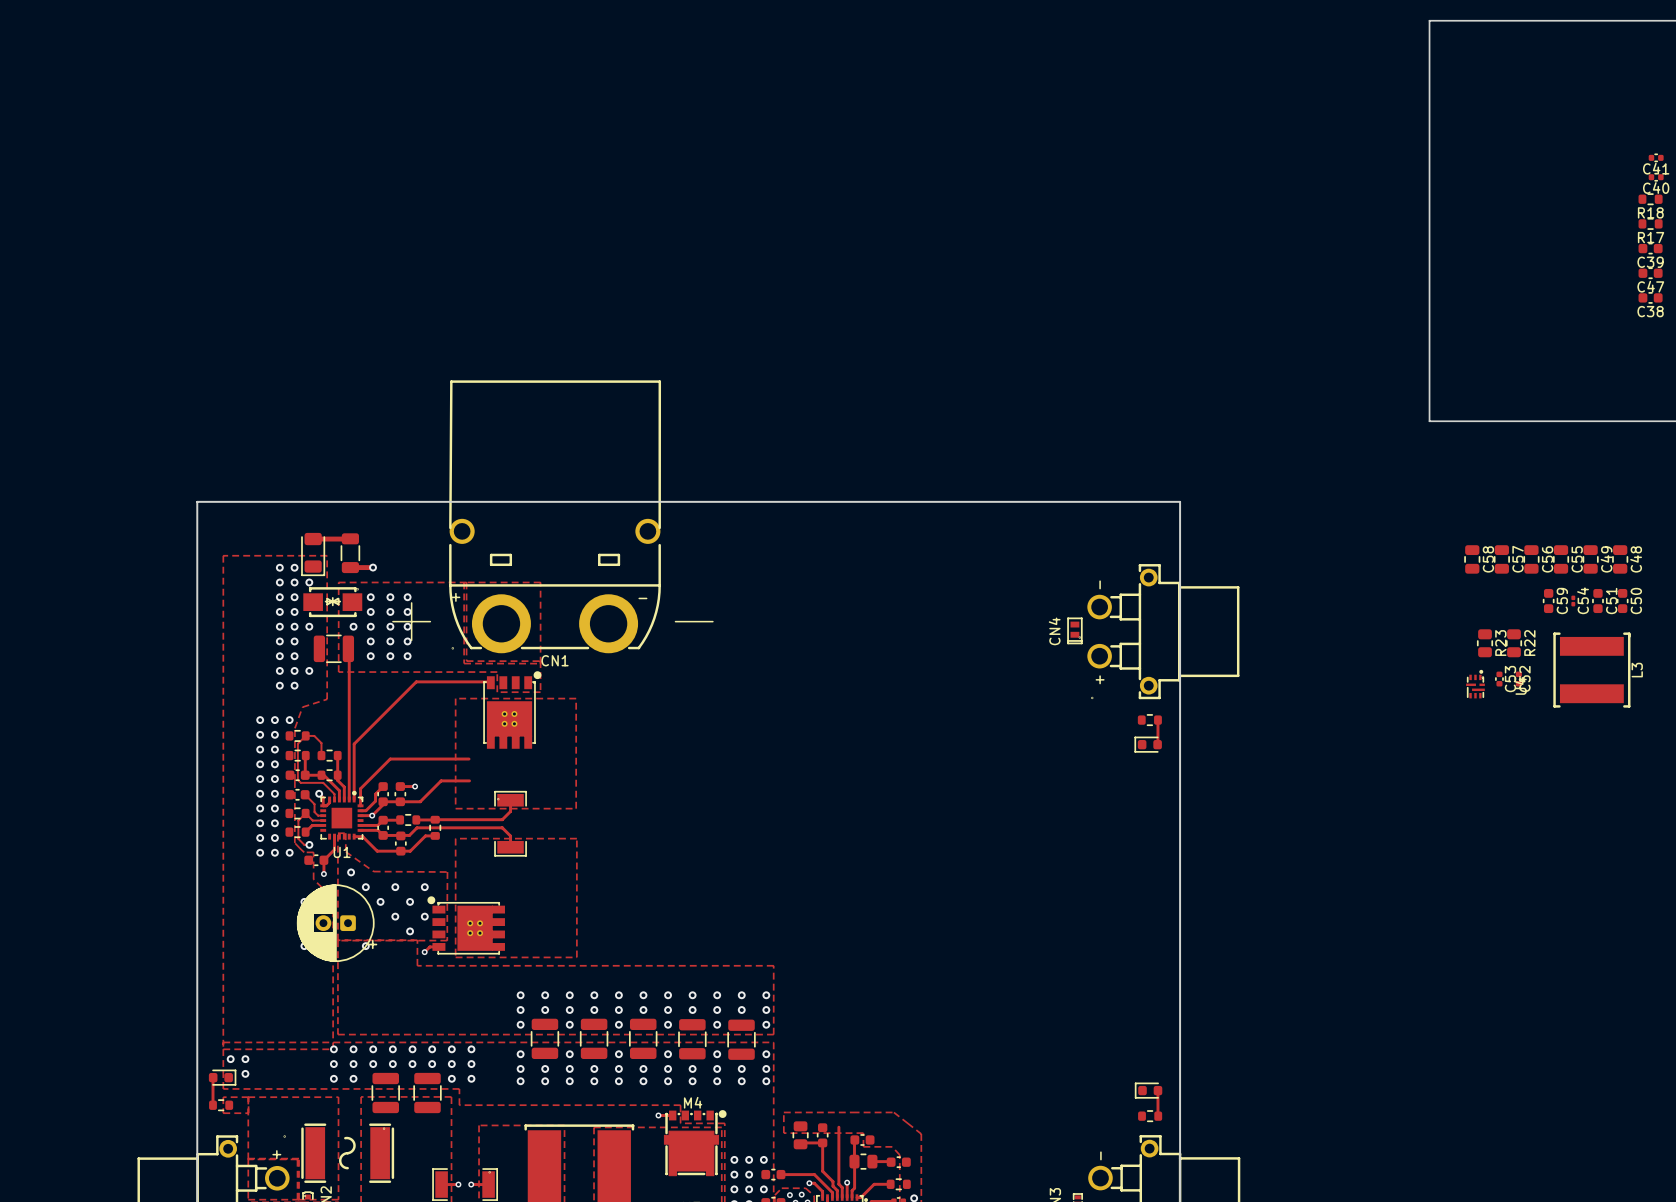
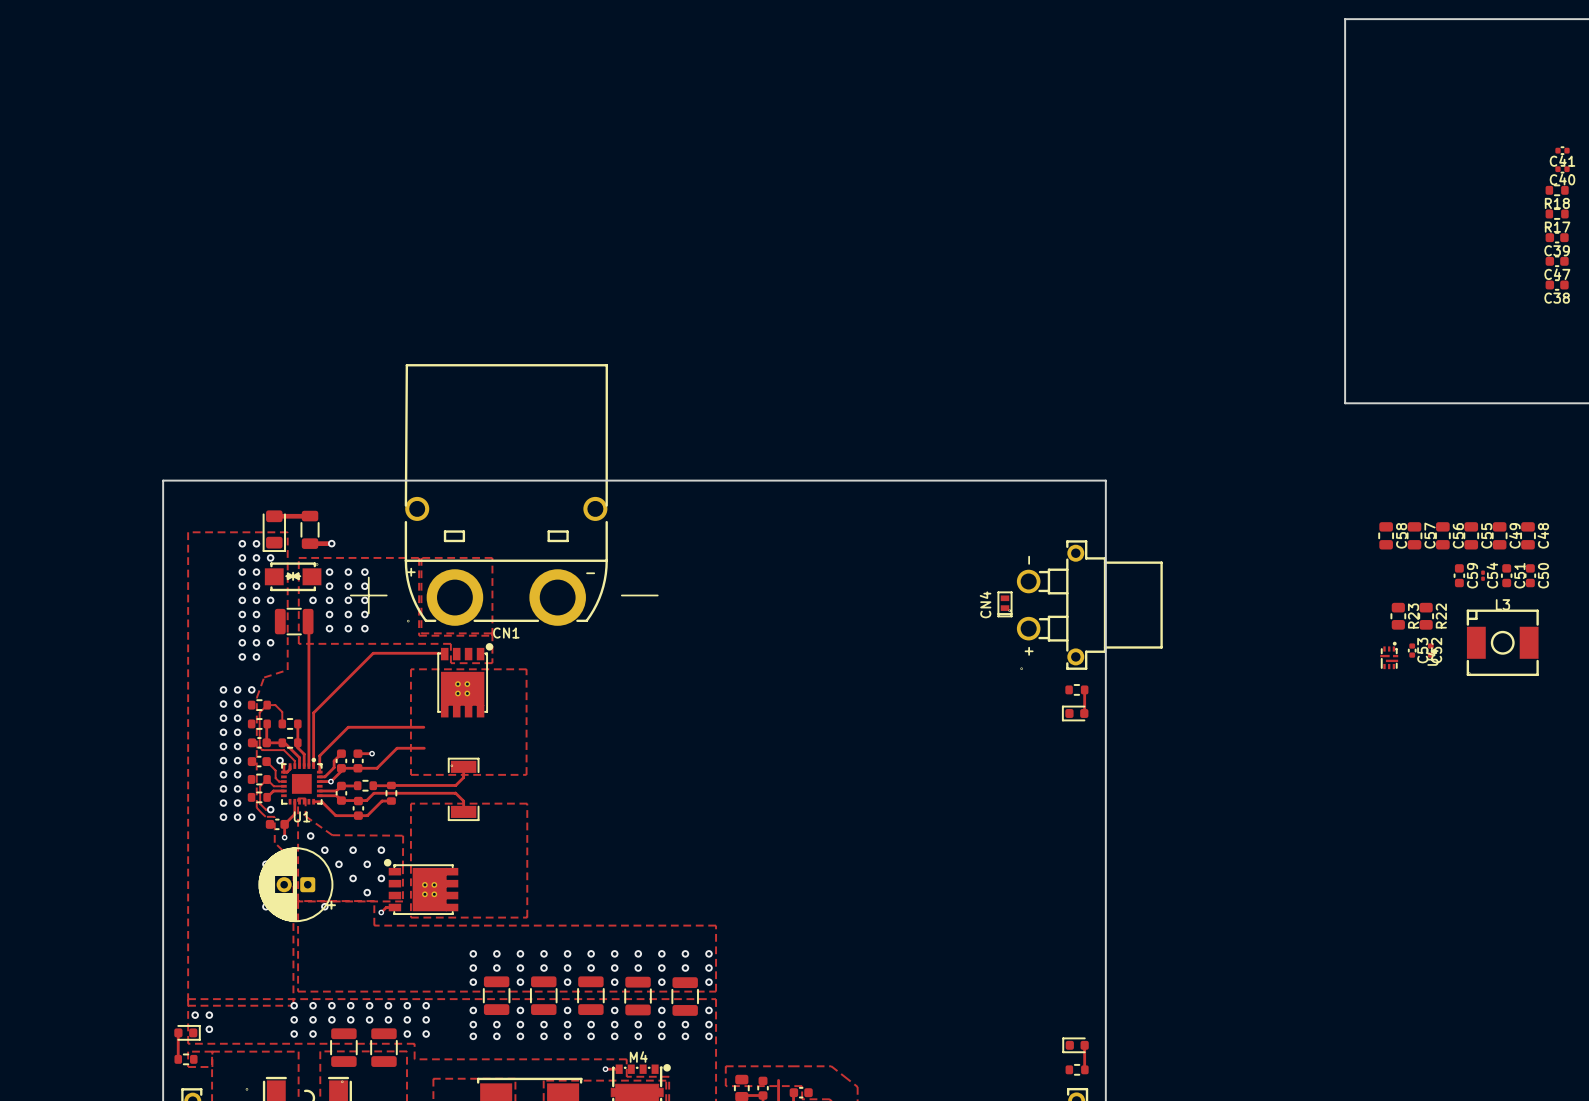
L3 footprint: [1553, 632, 1631, 708] -> [1466, 609, 1539, 677]
L3 name position: L3 (1637, 670) -> L3 (1502, 604)

